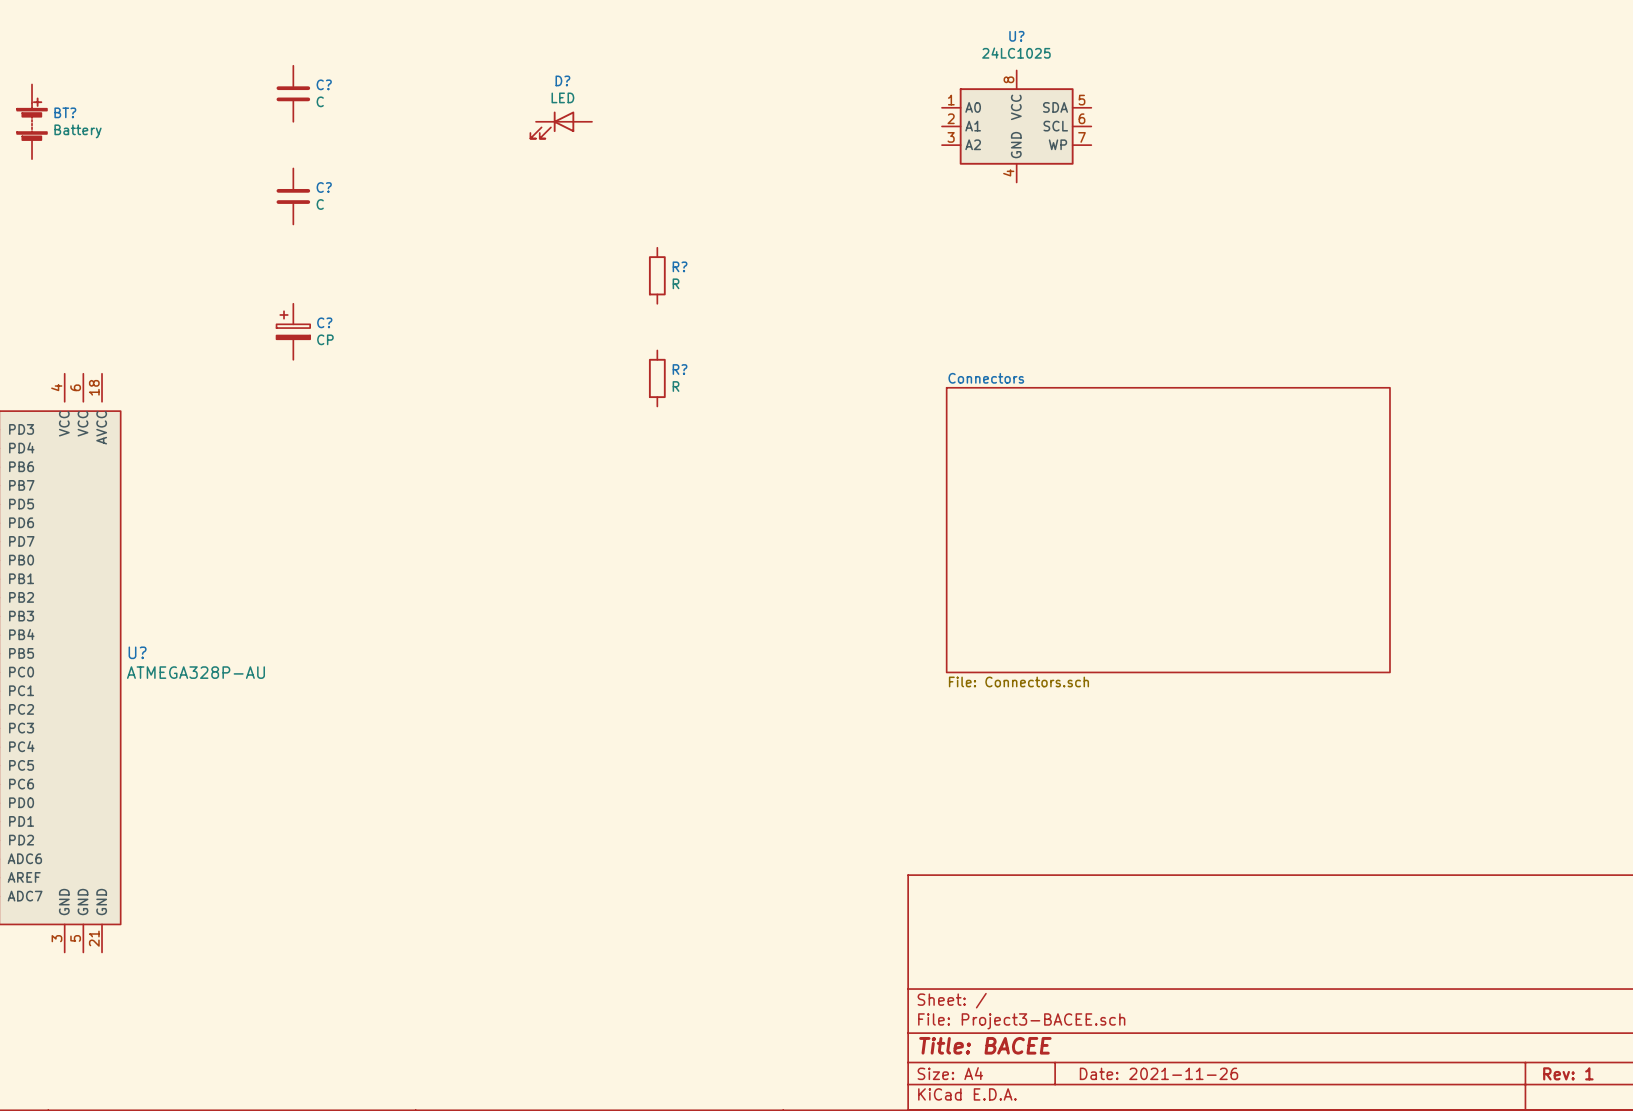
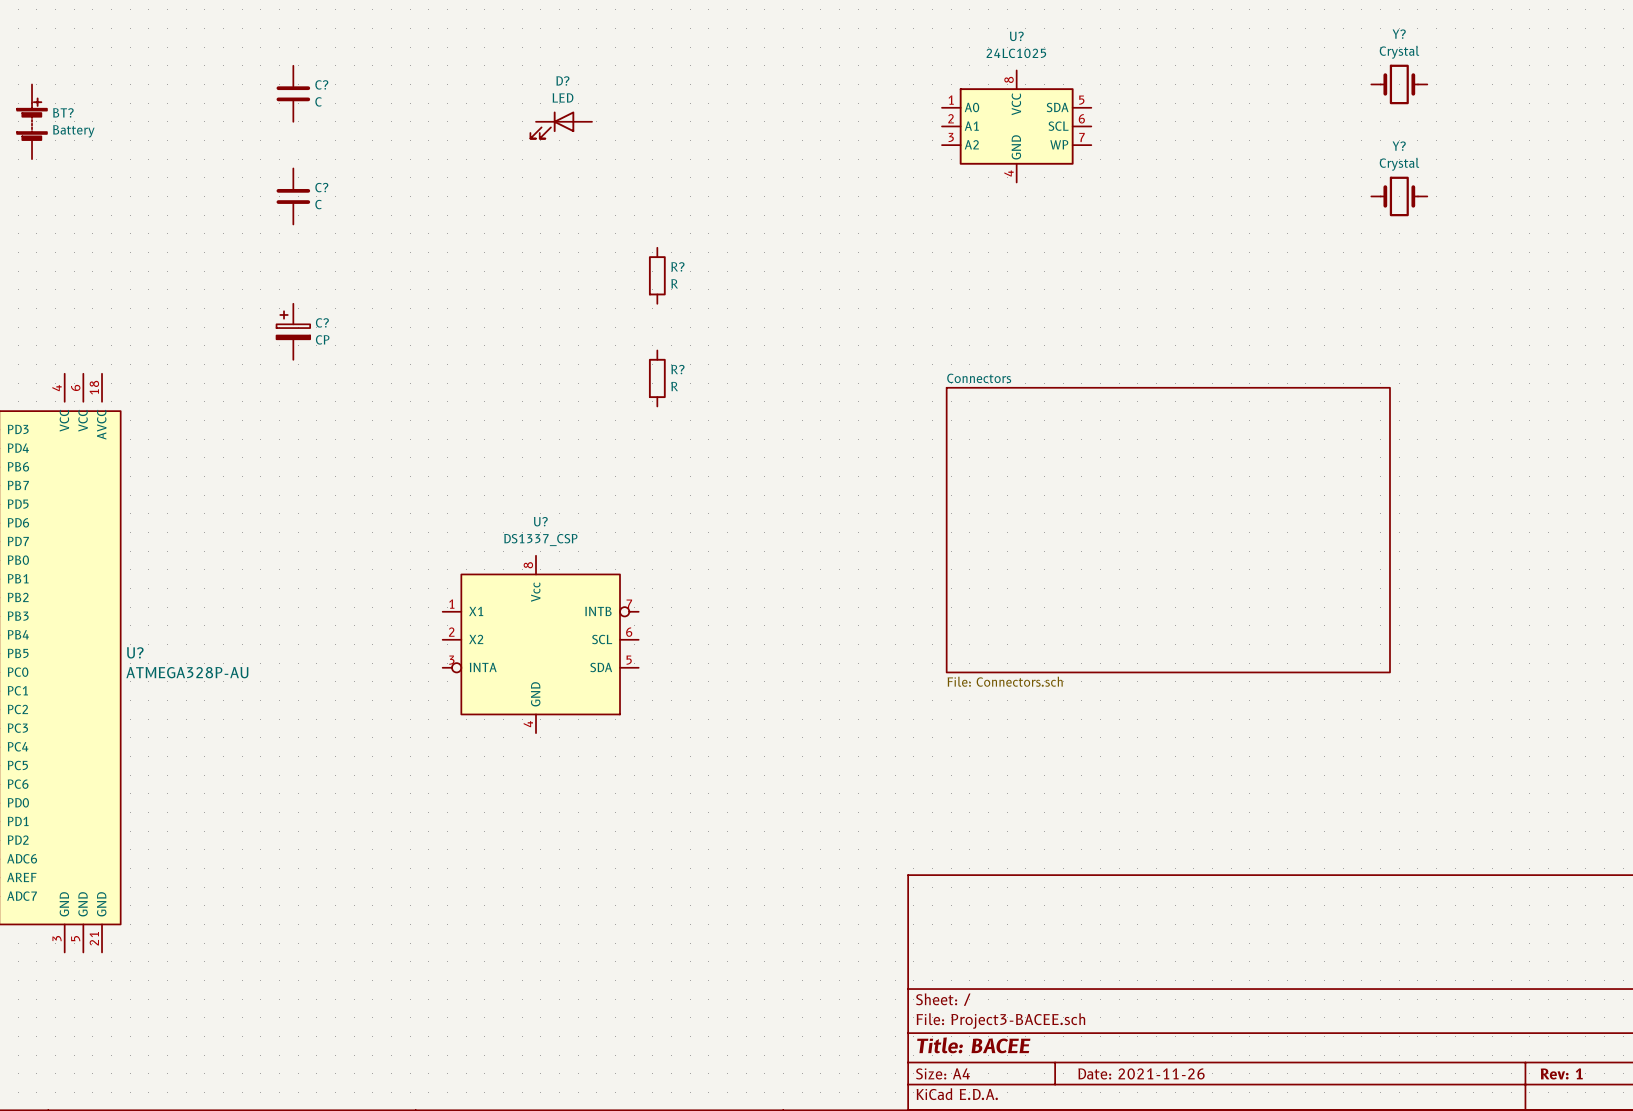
Y?: none -> Crystal (1399, 84)
Y?: none -> Crystal (1399, 196)
U?: none -> DS1337_CSP (540, 644)

